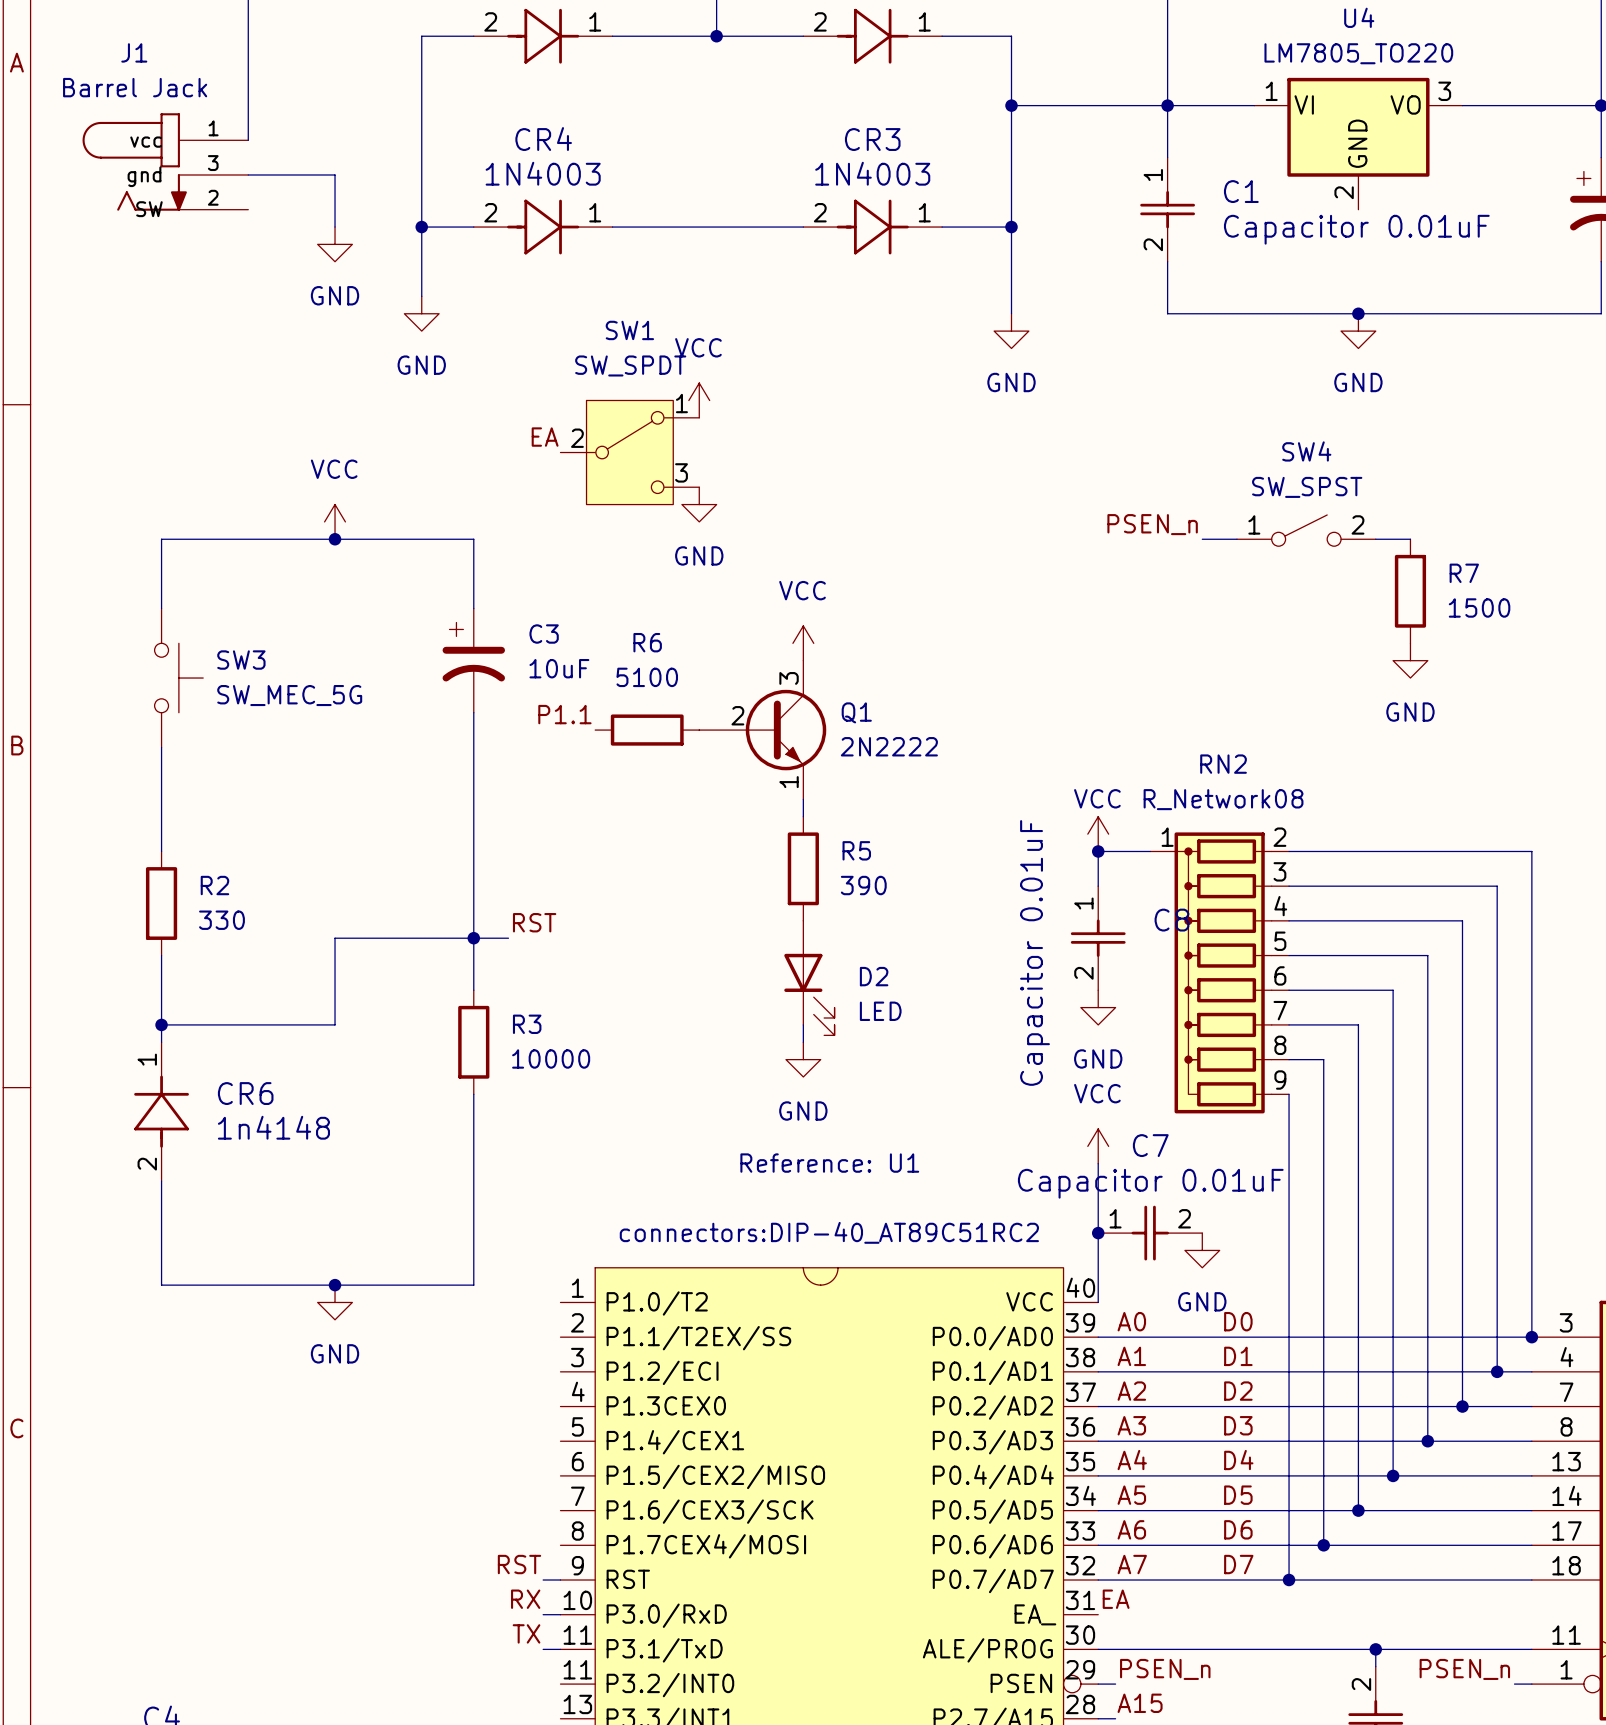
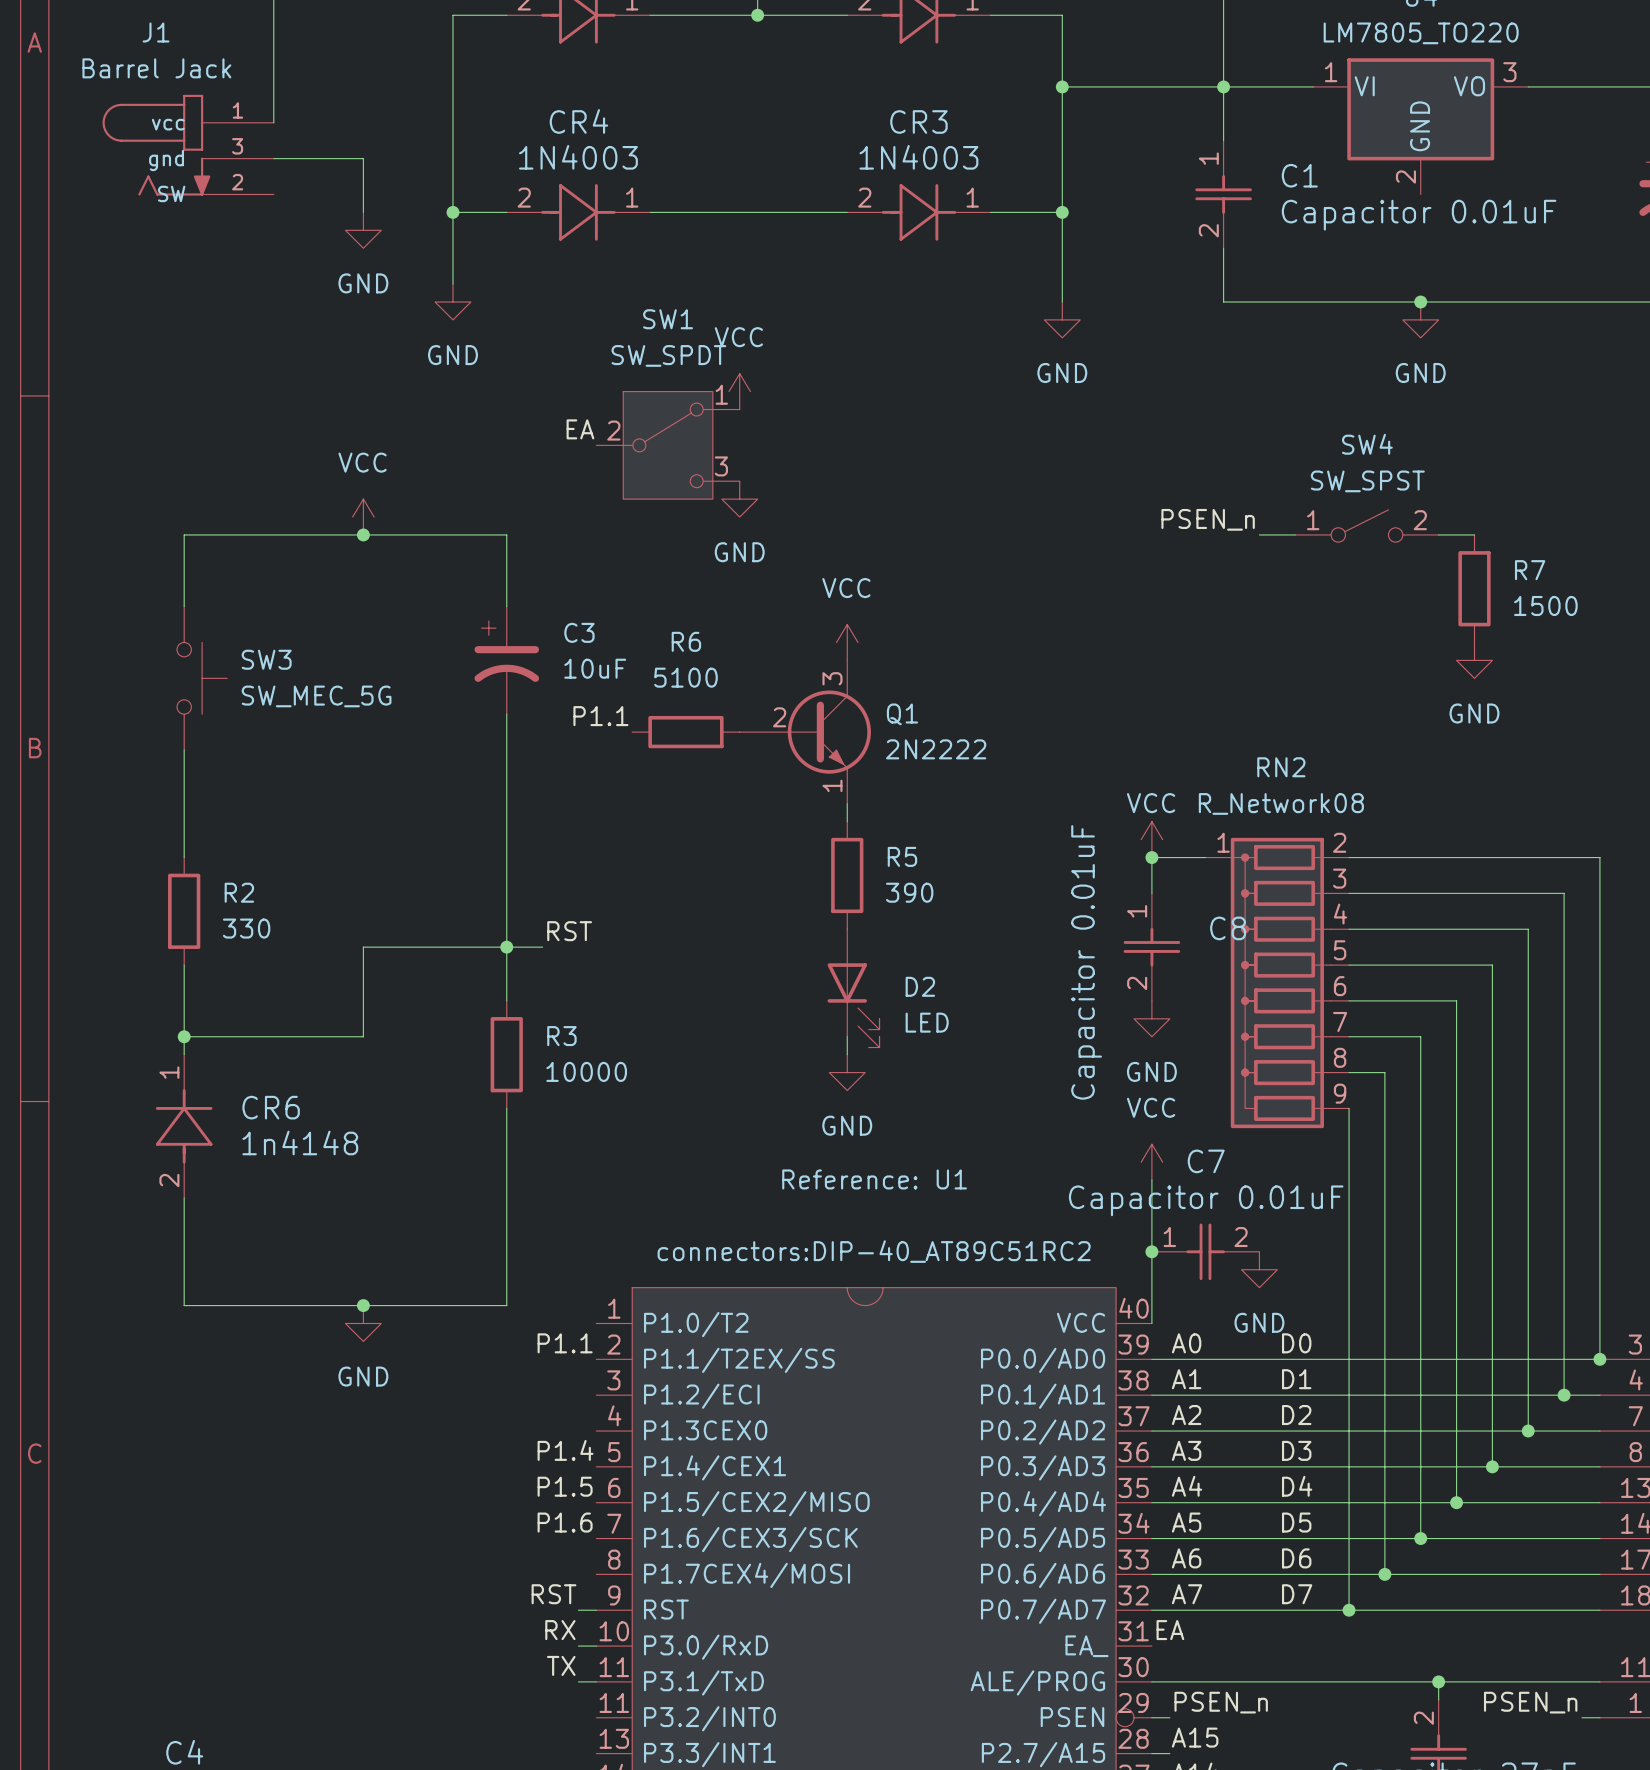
label: none -> P1.1 (565, 1343)
label: none -> P1.4 (565, 1450)
label: none -> P1.5 (565, 1486)
label: none -> P1.6 (565, 1522)

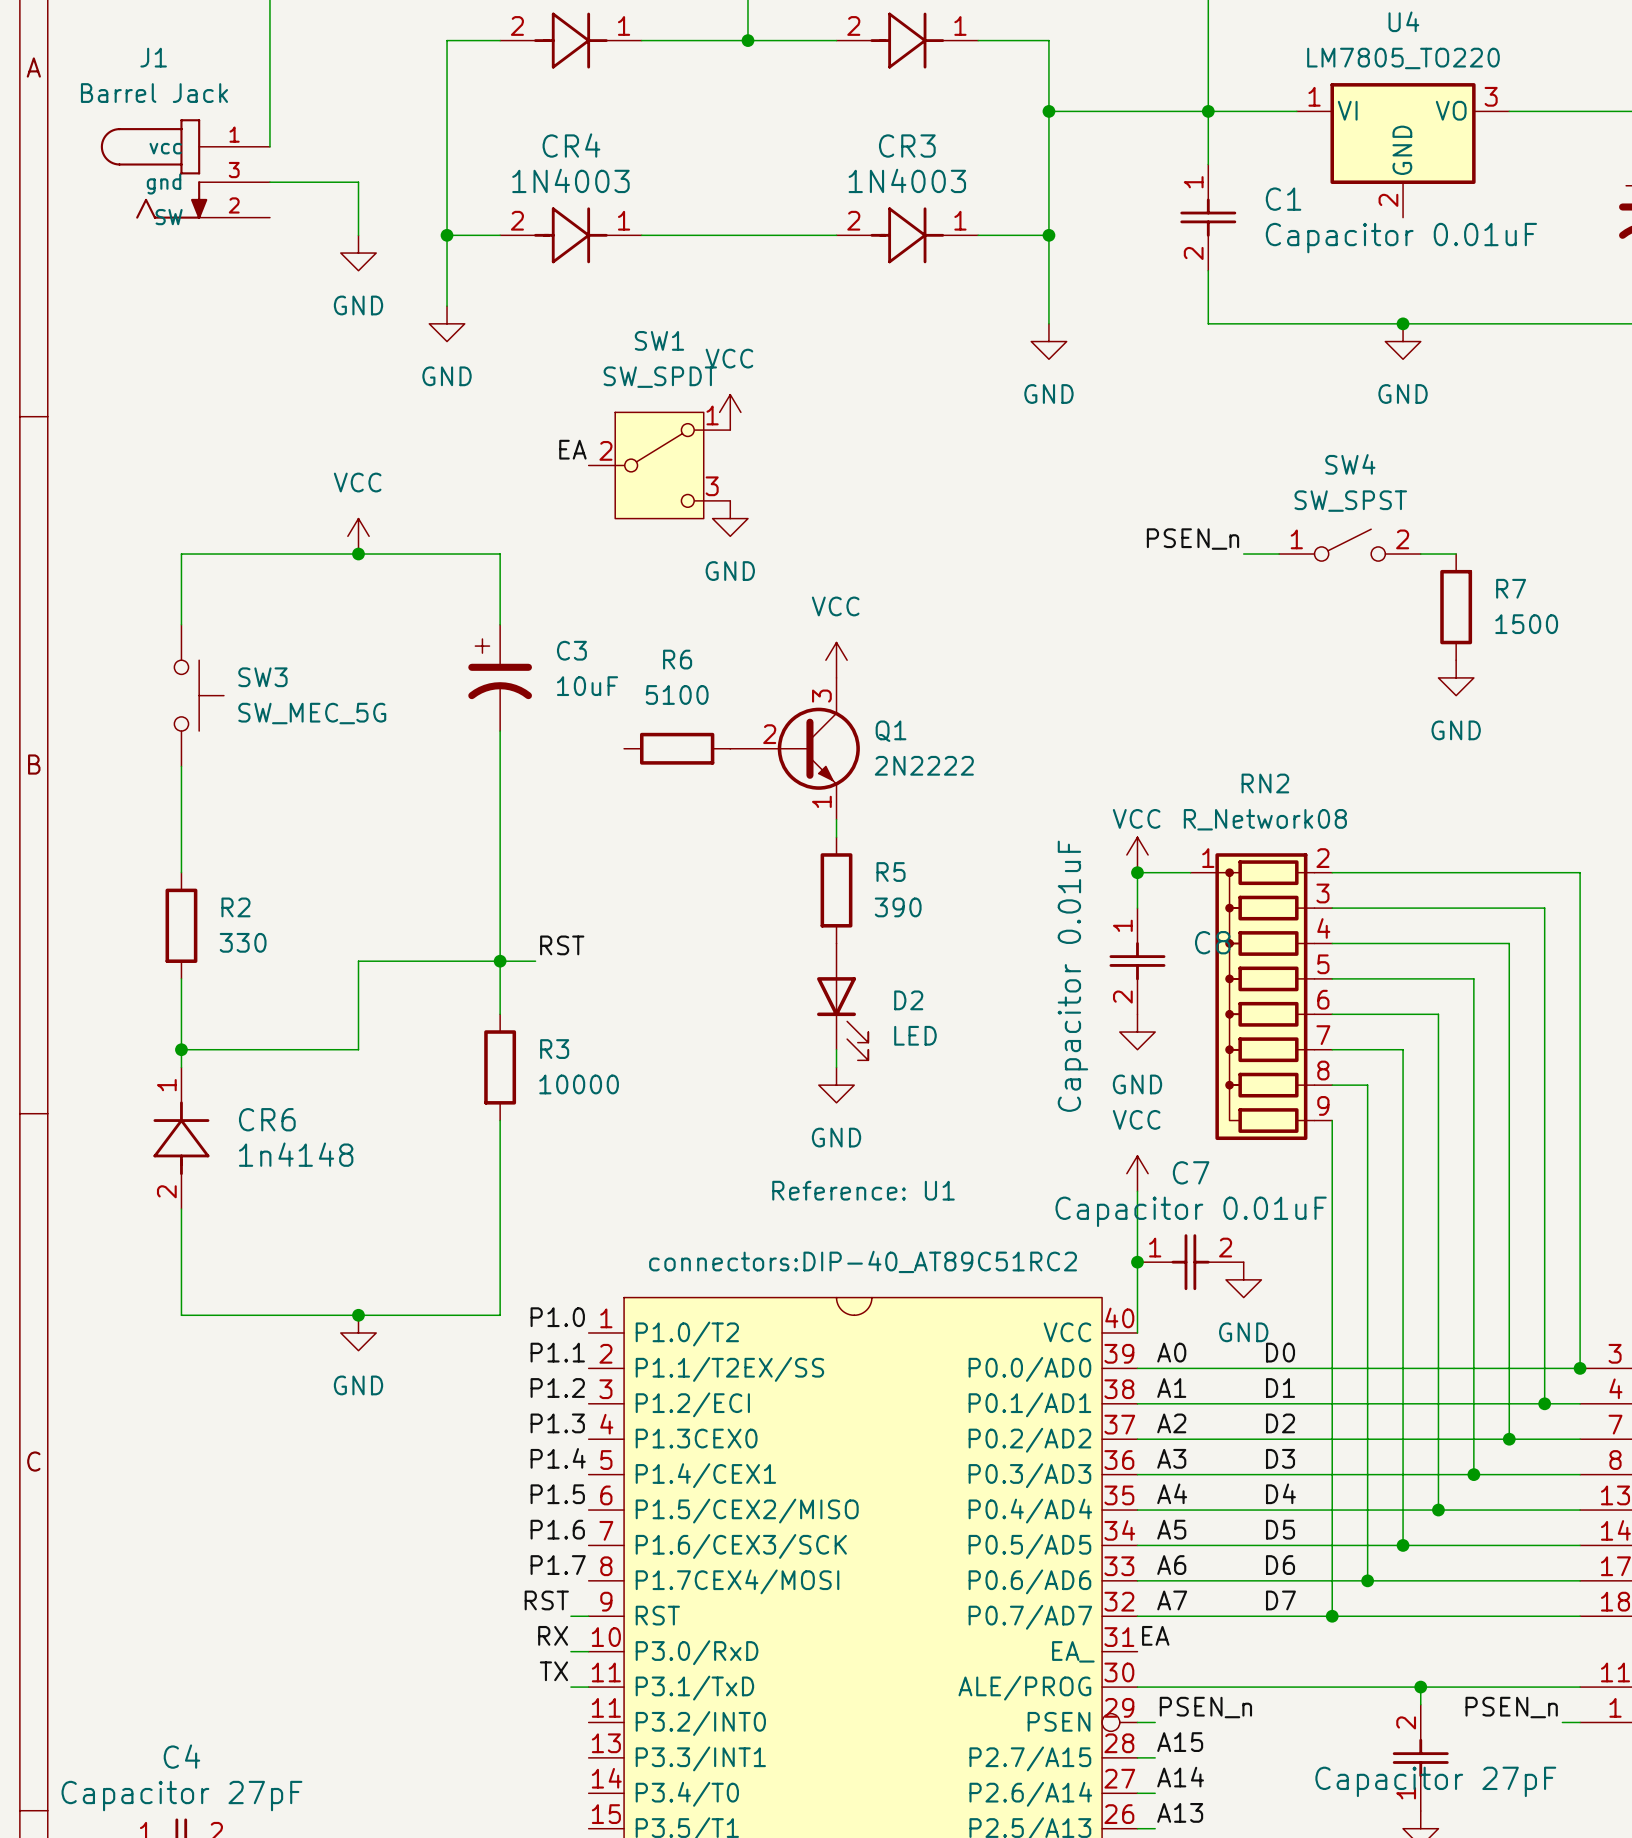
label: P1.1 (600, 716) -> none
label: none -> P1.0 (557, 1317)
label: none -> P1.2 (557, 1388)
label: none -> P1.3 (557, 1423)
label: none -> P1.7 (558, 1565)

